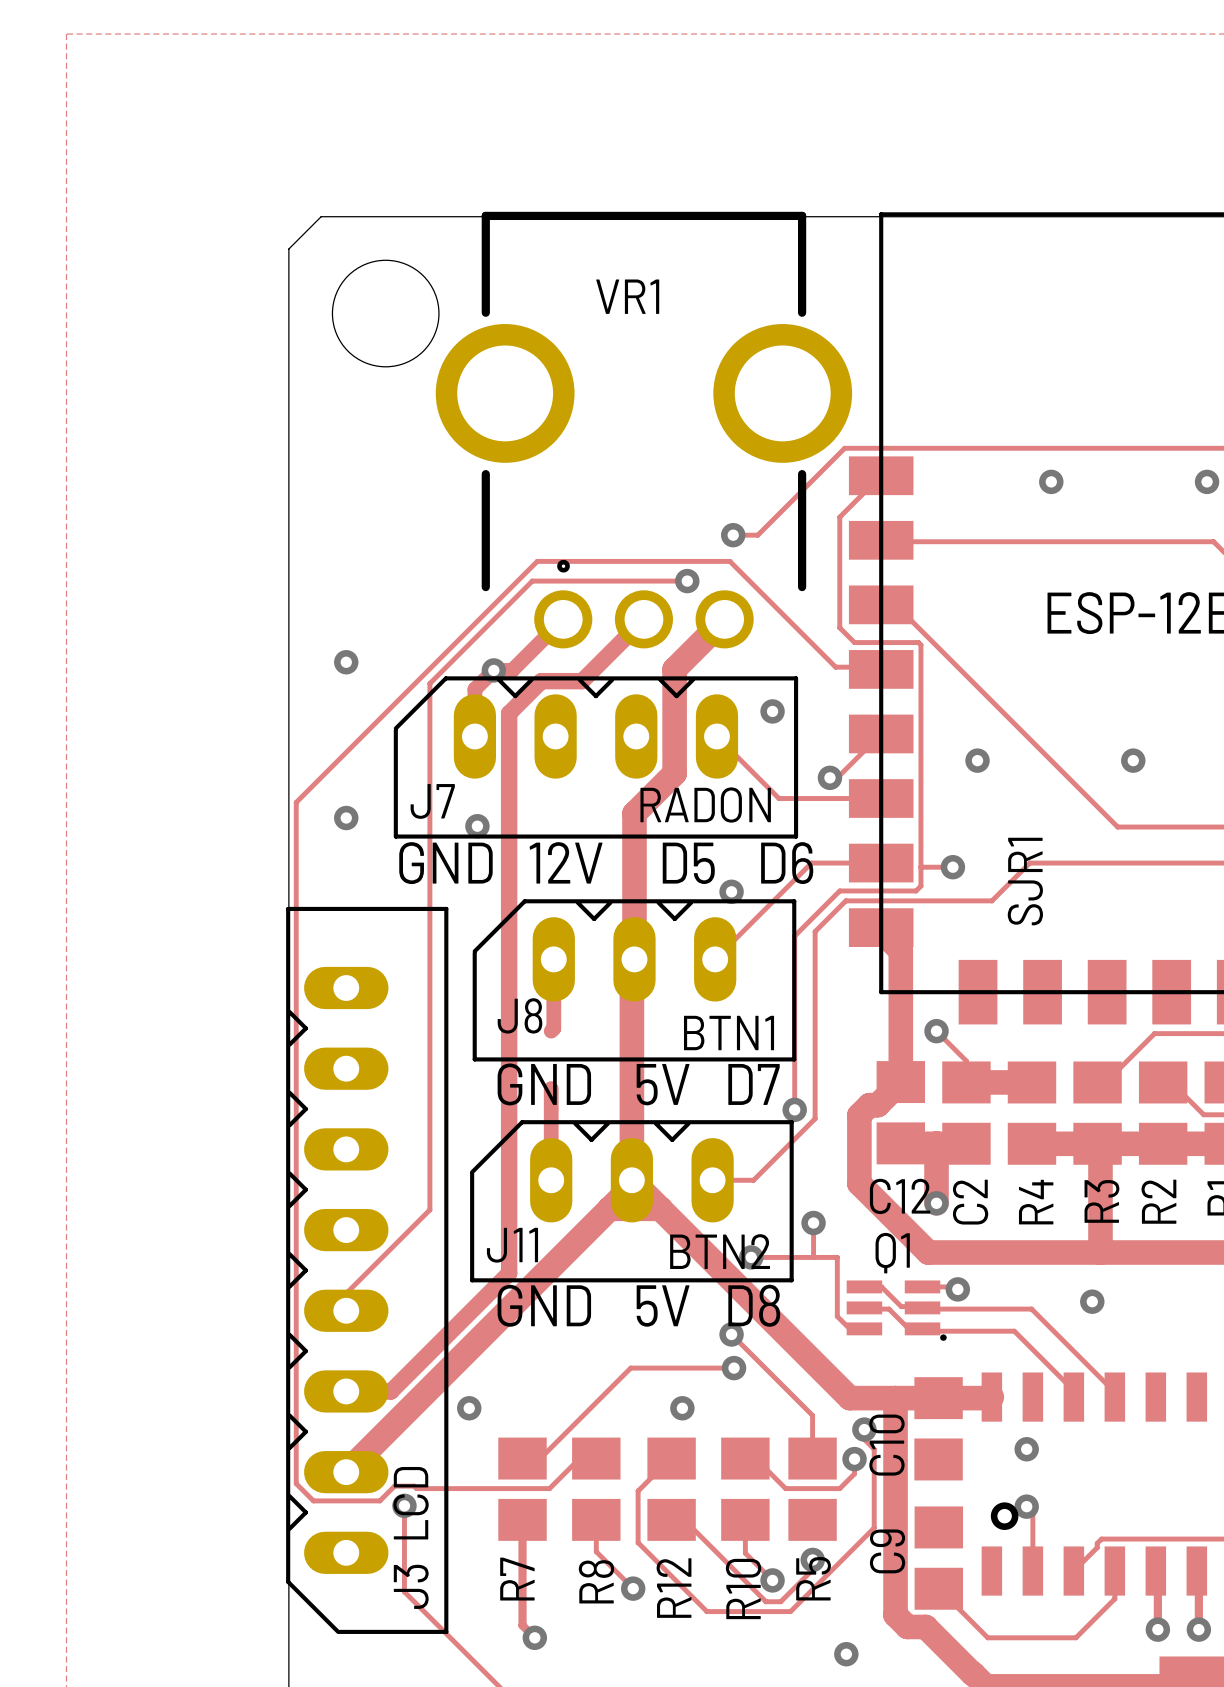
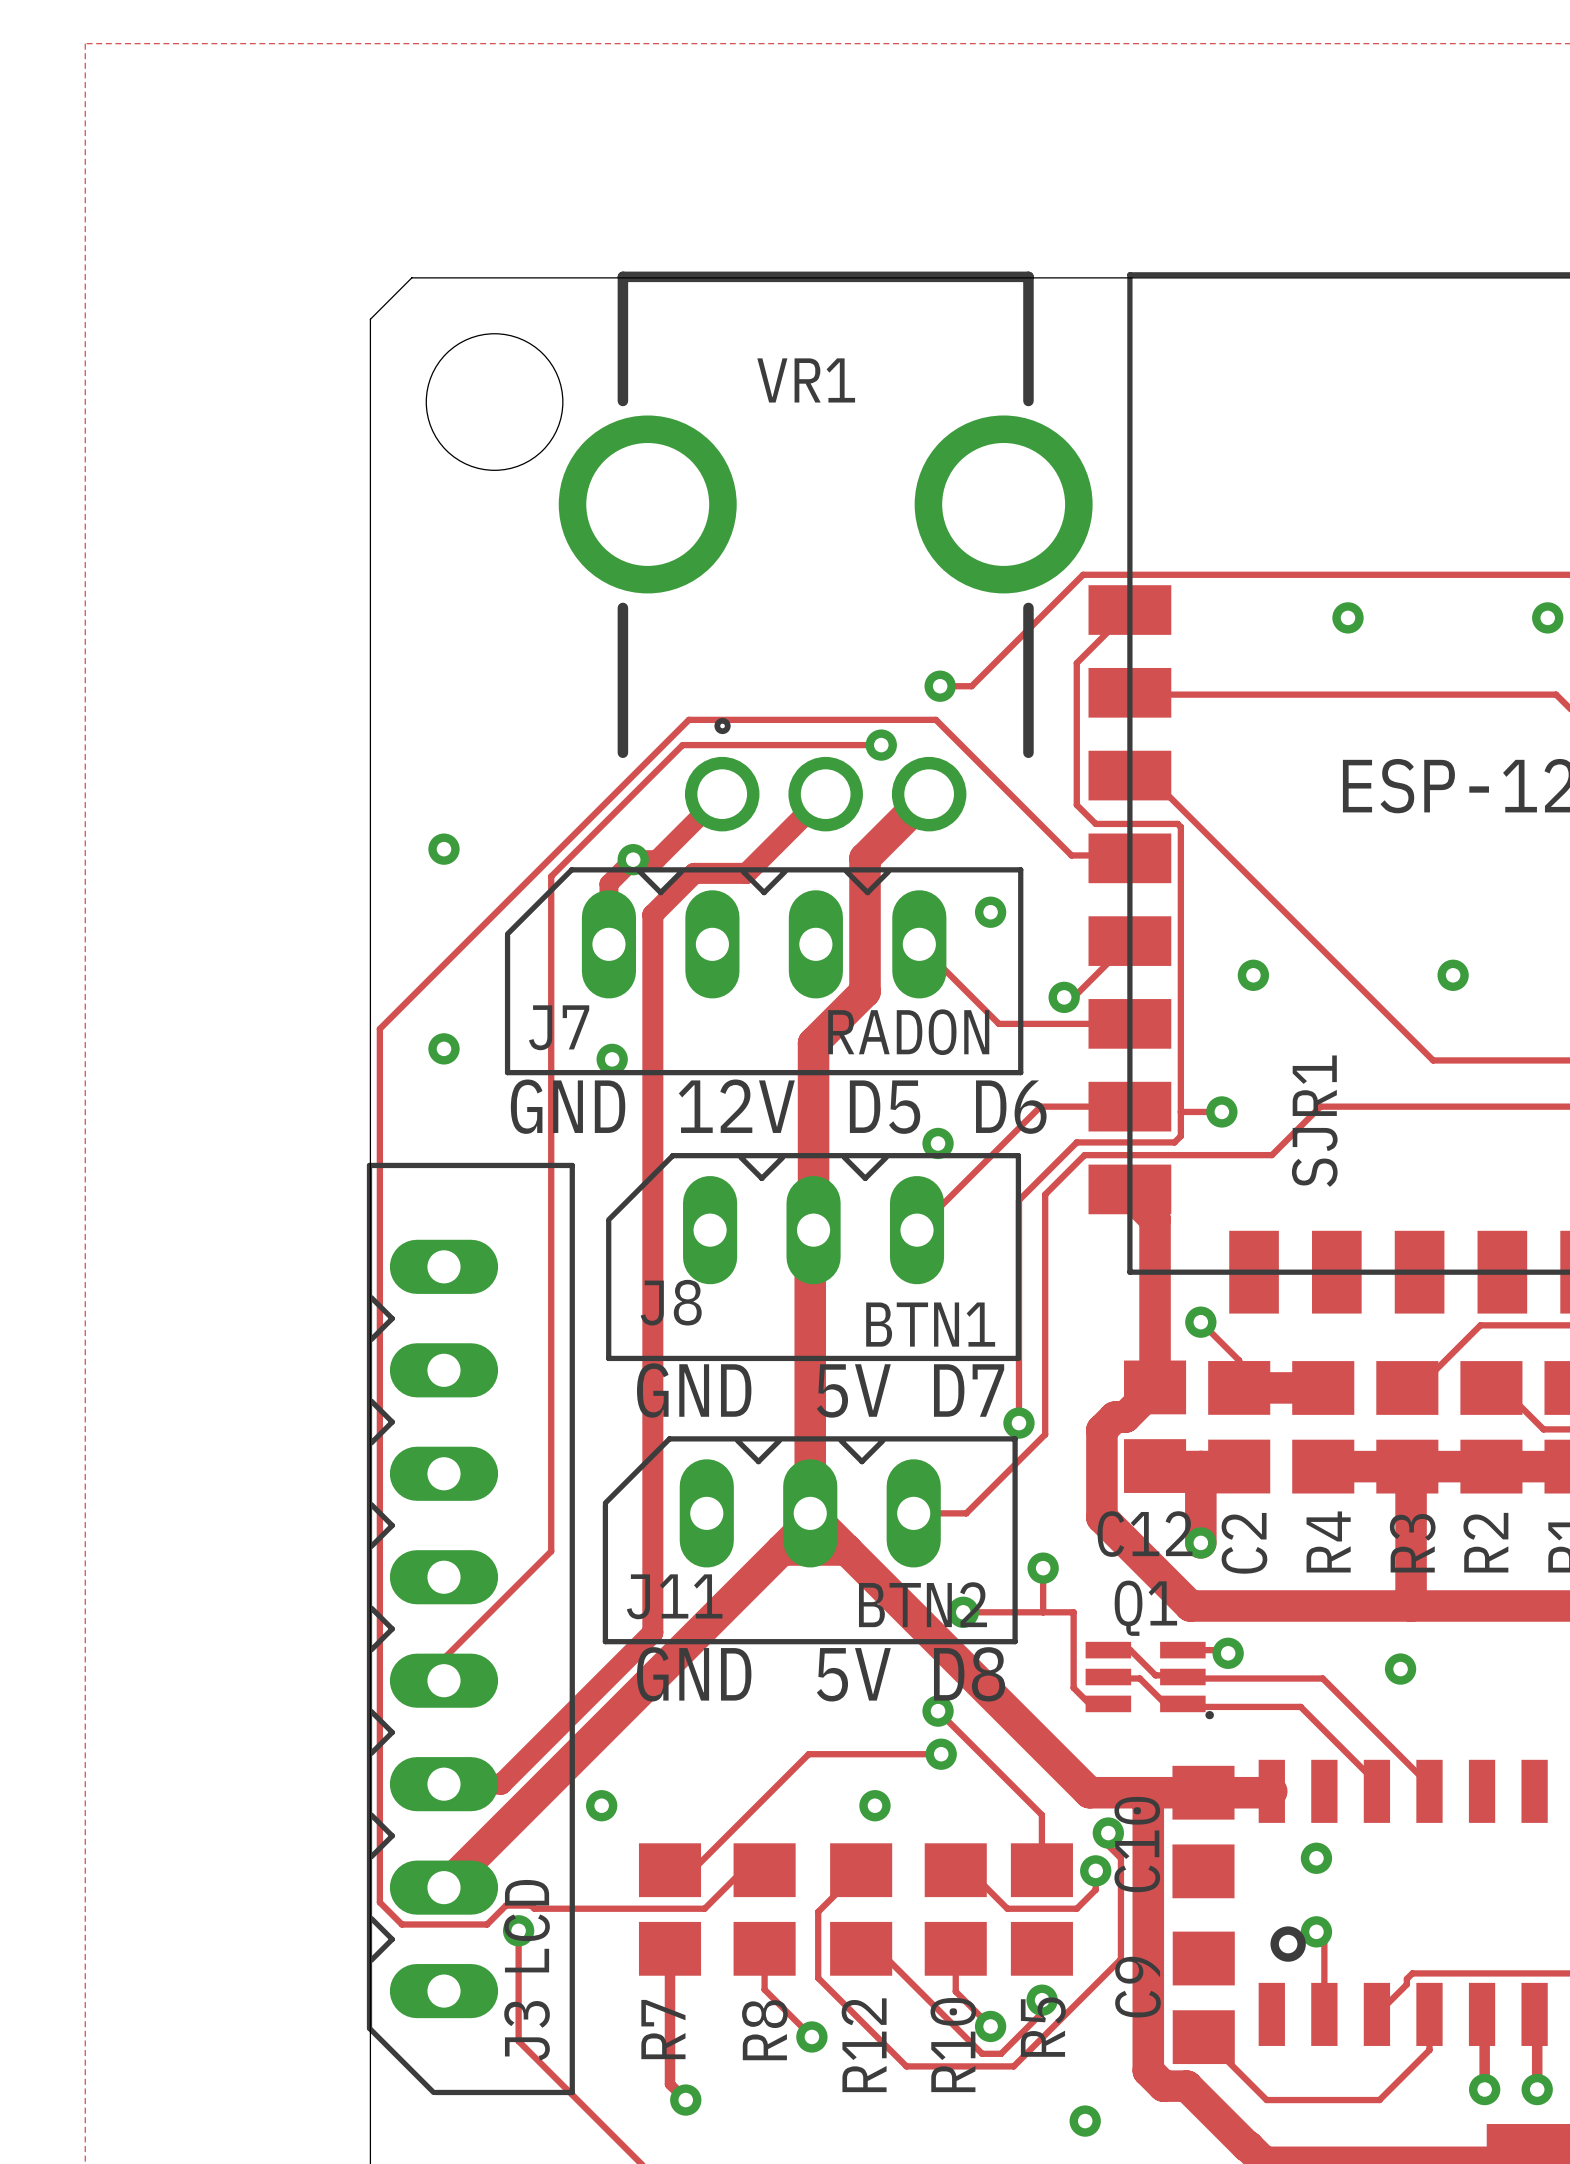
track: (553, 959) (553, 1028) (551, 1031) -> none
track: (551, 1088) (551, 1180) -> none

